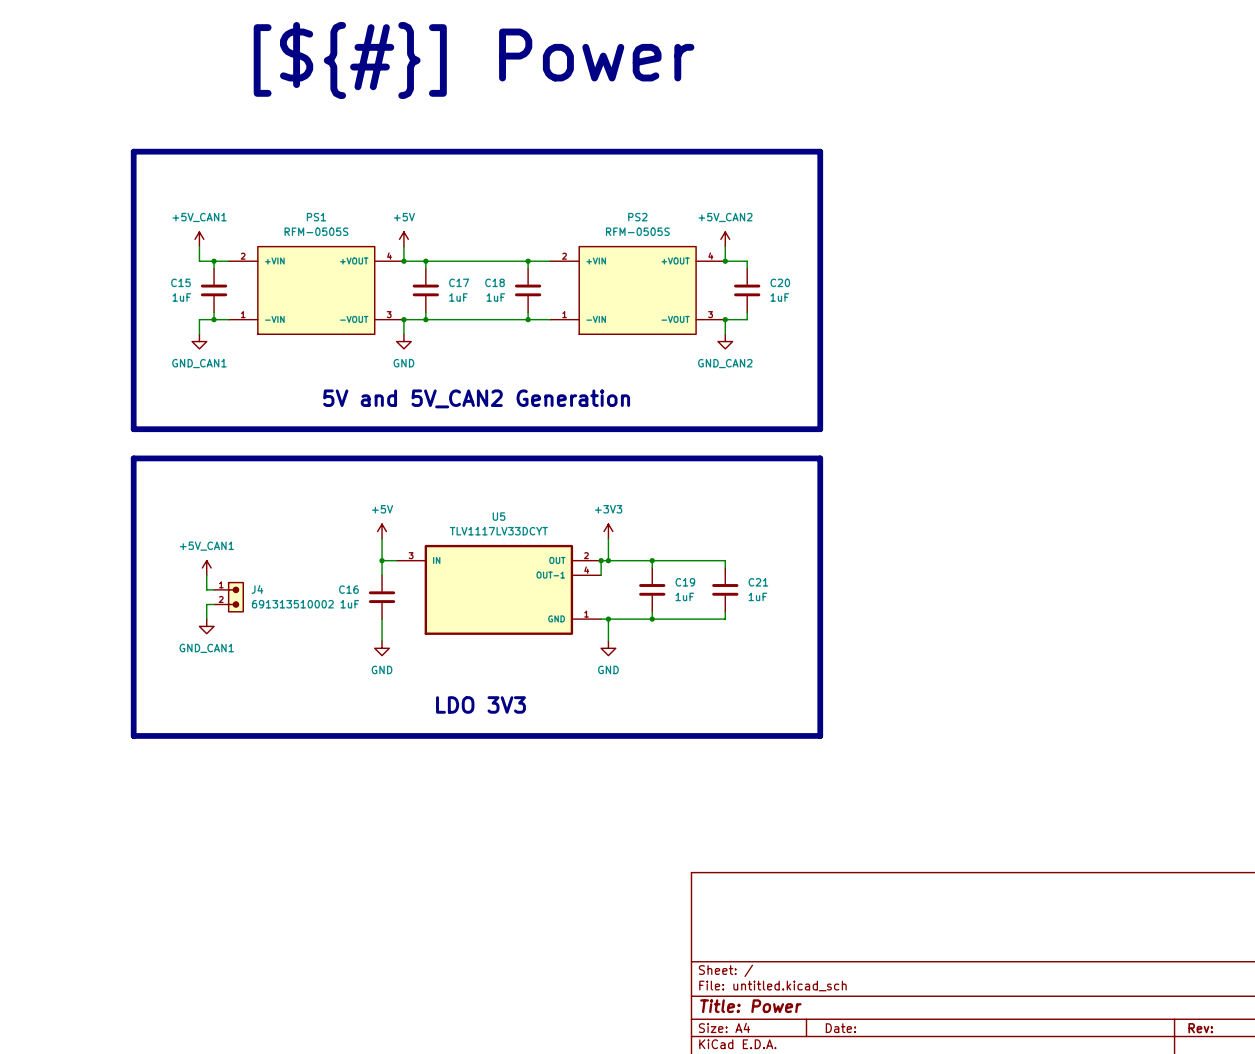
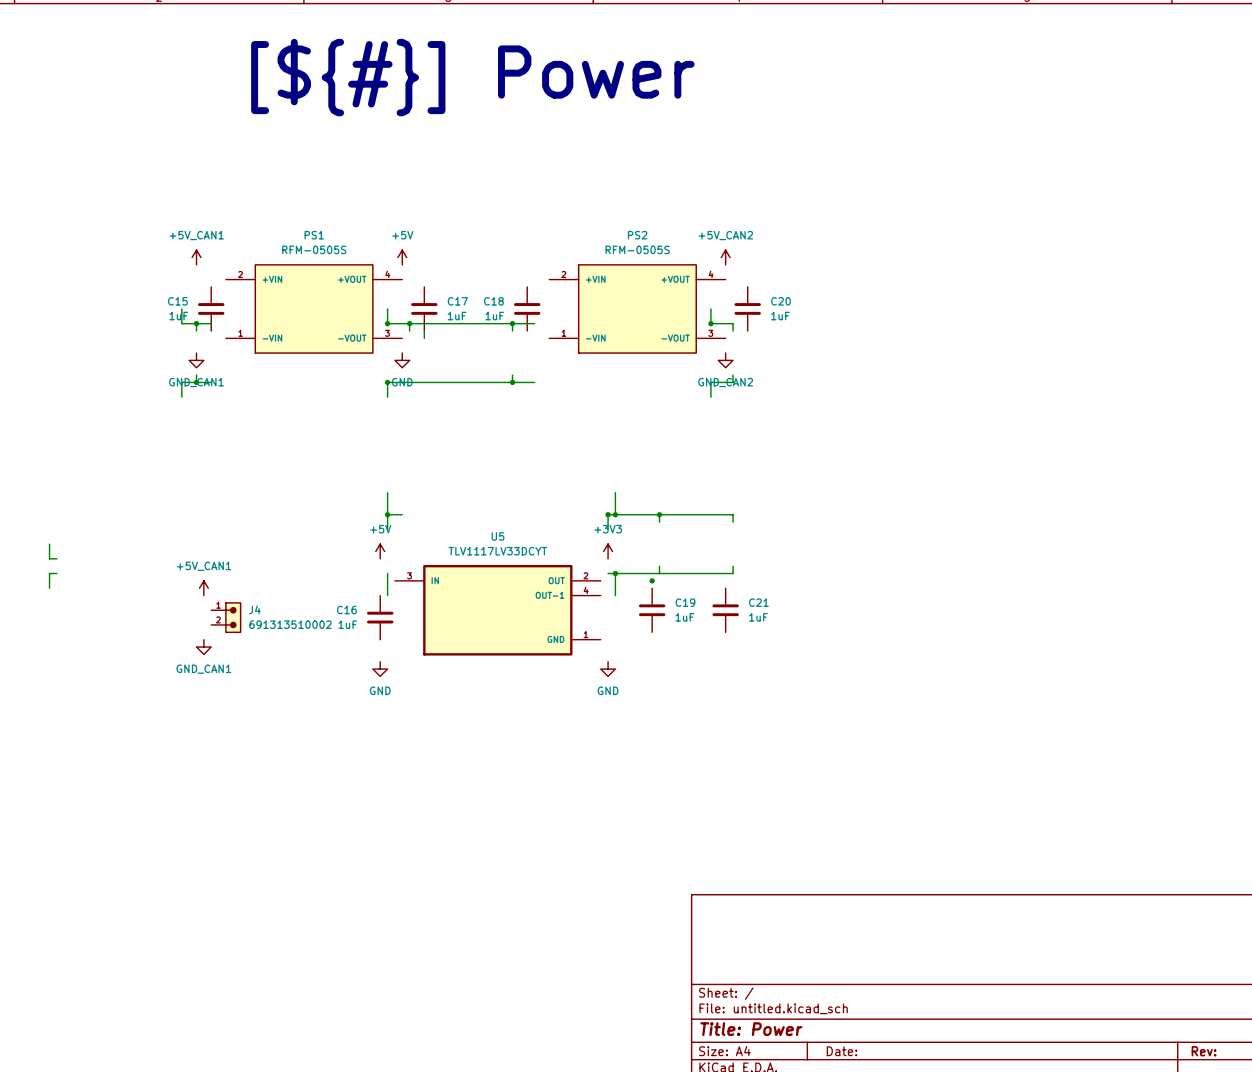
line: (133, 151) (133, 429) (820, 429) (820, 151) (133, 151) -> none
wire: (199, 246) (199, 261) (228, 261) -> (181, 308) (181, 323) (211, 323)
wire: (403, 246) (403, 261) (550, 261) -> (387, 308) (387, 323) (534, 323)
wire: (725, 246) (725, 261) (747, 261) (747, 268) -> (710, 308) (710, 323) (732, 323) (732, 331)
wire: (214, 261) (214, 268) -> (196, 323) (196, 331)
junction: (214, 261) -> none
junction: (403, 261) -> none
wire: (425, 261) (425, 268) -> (409, 323) (409, 331)
junction: (425, 261) -> none
wire: (528, 261) (528, 268) -> (512, 323) (512, 331)
junction: (528, 261) -> none
junction: (725, 261) -> none
junction: none -> (387, 323)
junction: none -> (409, 323)
wire: (214, 312) (214, 319) -> (196, 375) (196, 382)
wire: (528, 312) (528, 319) -> (512, 375) (512, 382)
wire: (747, 312) (747, 319) (725, 319) (725, 334) -> (732, 375) (732, 382) (710, 382) (710, 397)
junction position: (214, 319) -> (196, 323)
wire: (228, 319) (199, 319) (199, 334) -> (211, 382) (181, 382) (181, 397)
junction: (403, 319) -> none
junction: (425, 319) -> none
junction position: (528, 319) -> (512, 323)
wire: (550, 319) (403, 319) (403, 334) -> (534, 382) (387, 382) (387, 397)
junction position: (725, 319) -> (710, 323)
junction: none -> (196, 382)
junction: none -> (387, 382)
junction: none -> (512, 382)
text: 5V and 5V_CAN2 Generation (476, 398) -> none
line: (133, 458) (820, 458) (820, 735) (133, 735) (133, 458) -> none
junction: none -> (387, 514)
junction: none -> (608, 514)
junction: none -> (615, 514)
junction: none -> (659, 514)
wire: none -> (49, 544) (49, 558) (56, 558)
wire: (382, 538) (382, 575) -> (387, 492) (387, 529)
wire: (608, 538) (608, 560) -> (615, 492) (615, 514)
wire: none -> (56, 573) (49, 573) (49, 588)
junction: none -> (615, 573)
wire: (382, 560) (396, 560) -> (387, 514) (402, 514)
junction: (382, 560) -> none
junction: (601, 560) -> none
junction: (608, 560) -> none
wire: (652, 560) (652, 567) -> (659, 514) (659, 522)
wire: (725, 567) (725, 560) (601, 560) (601, 575) -> (732, 522) (732, 514) (608, 514) (608, 529)
wire: (206, 575) (206, 589) (214, 589) -> none
wire: (214, 604) (206, 604) (206, 619) -> none
wire: (652, 611) (652, 619) -> (659, 566) (659, 573)
wire: (725, 611) (725, 619) (601, 619) -> (732, 566) (732, 573) (608, 573)
wire: (382, 619) (382, 641) -> (387, 573) (387, 595)
wire: (608, 619) (608, 641) -> (615, 573) (615, 595)
junction: (608, 619) -> none
junction: (652, 619) -> none
text: LDO 3V3 (480, 704) -> none

